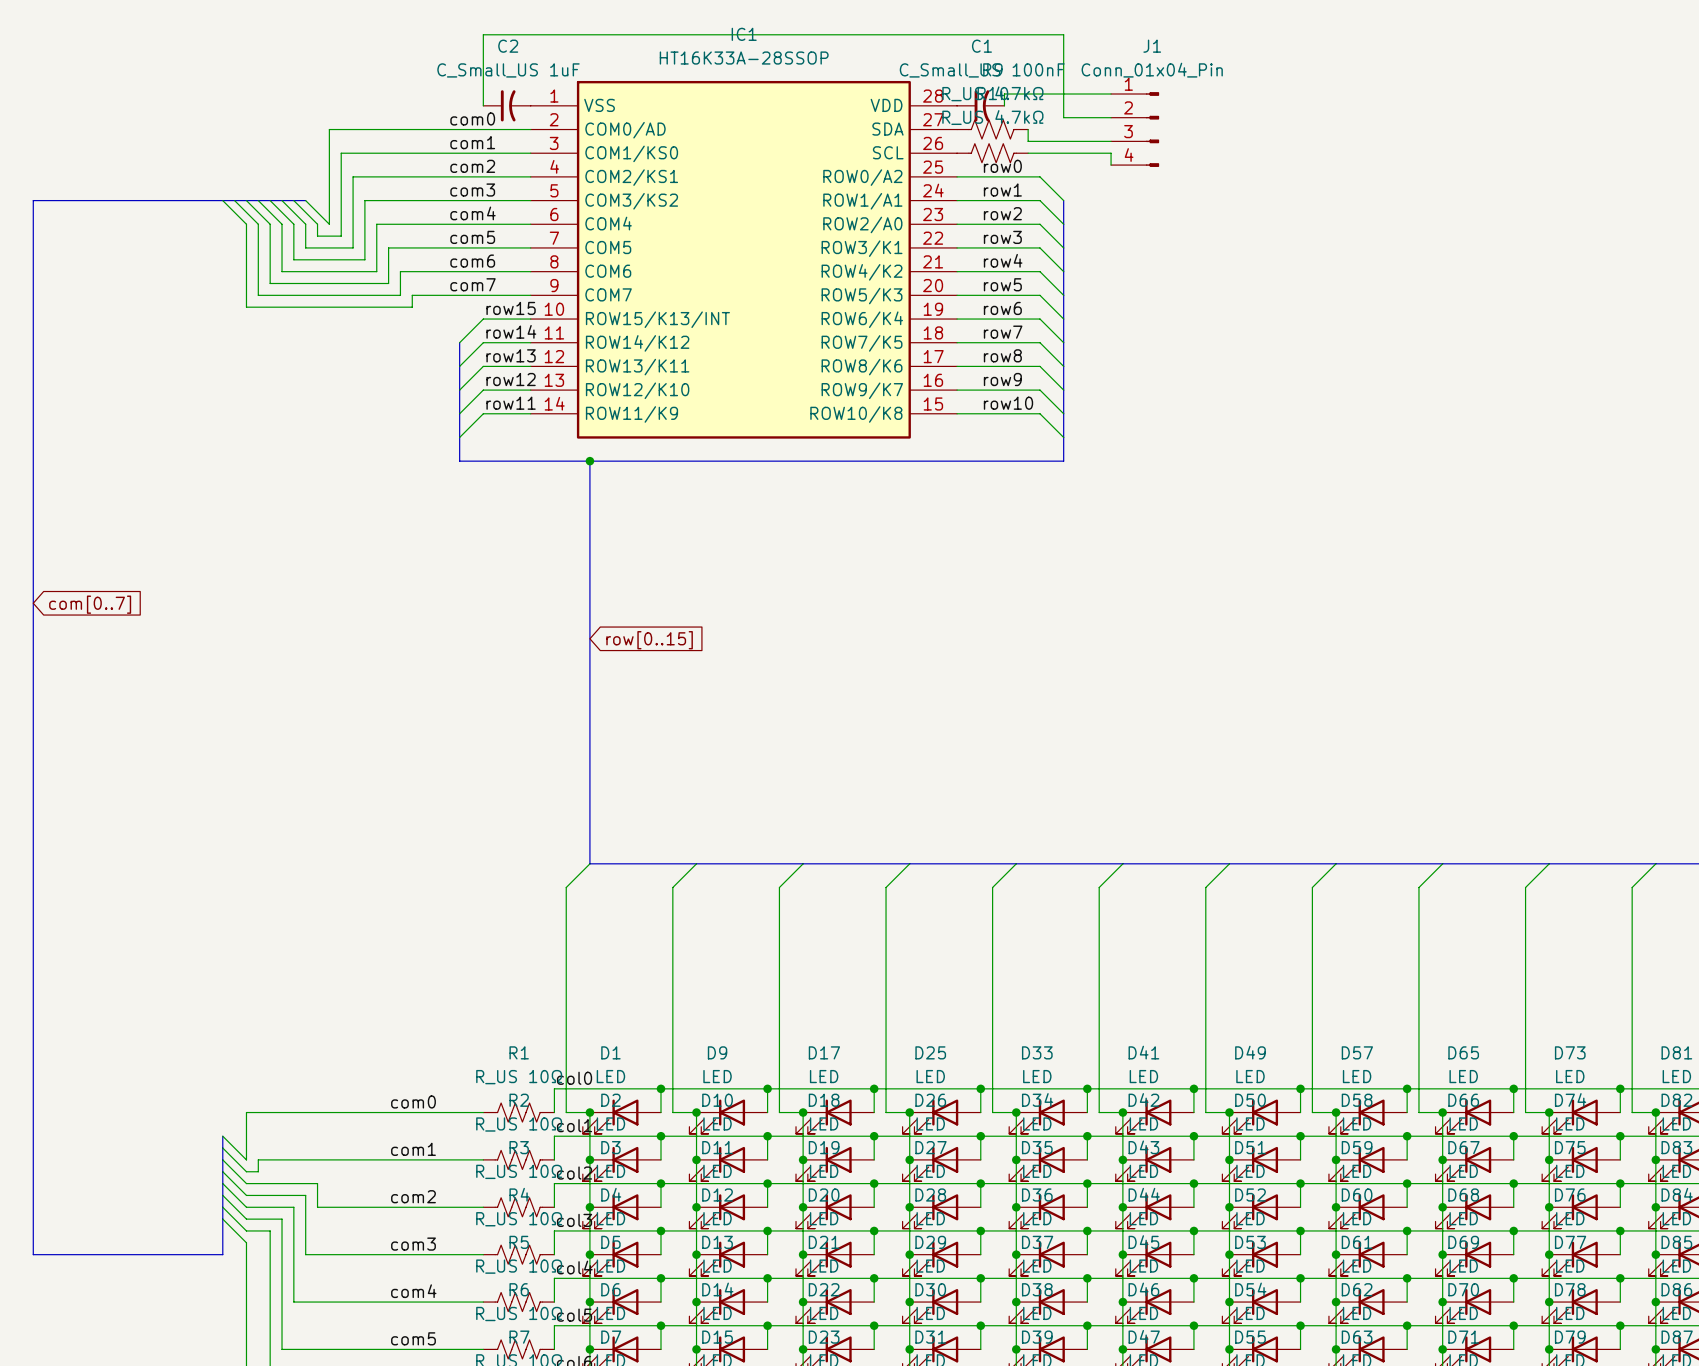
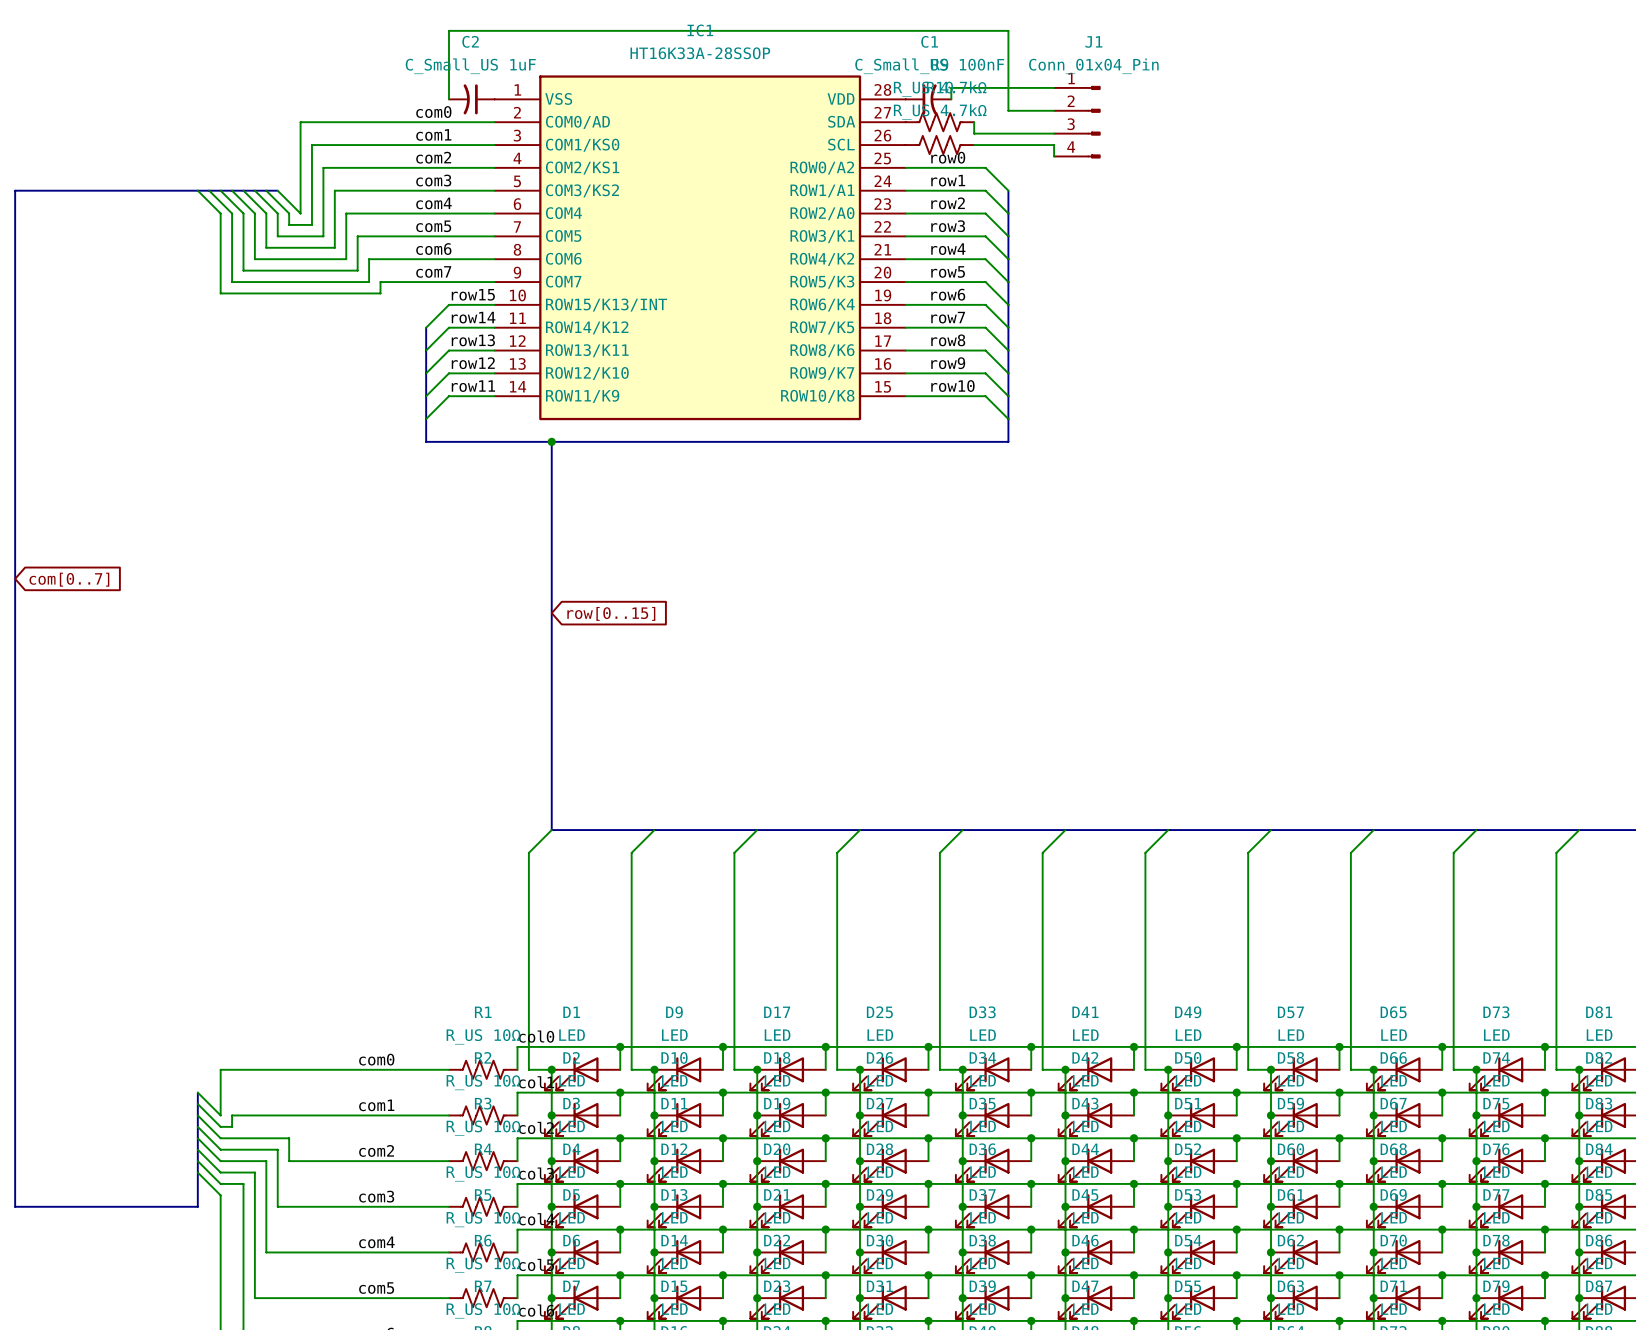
C2 rotation: 0° (508, 105) -> 180° (470, 99)

